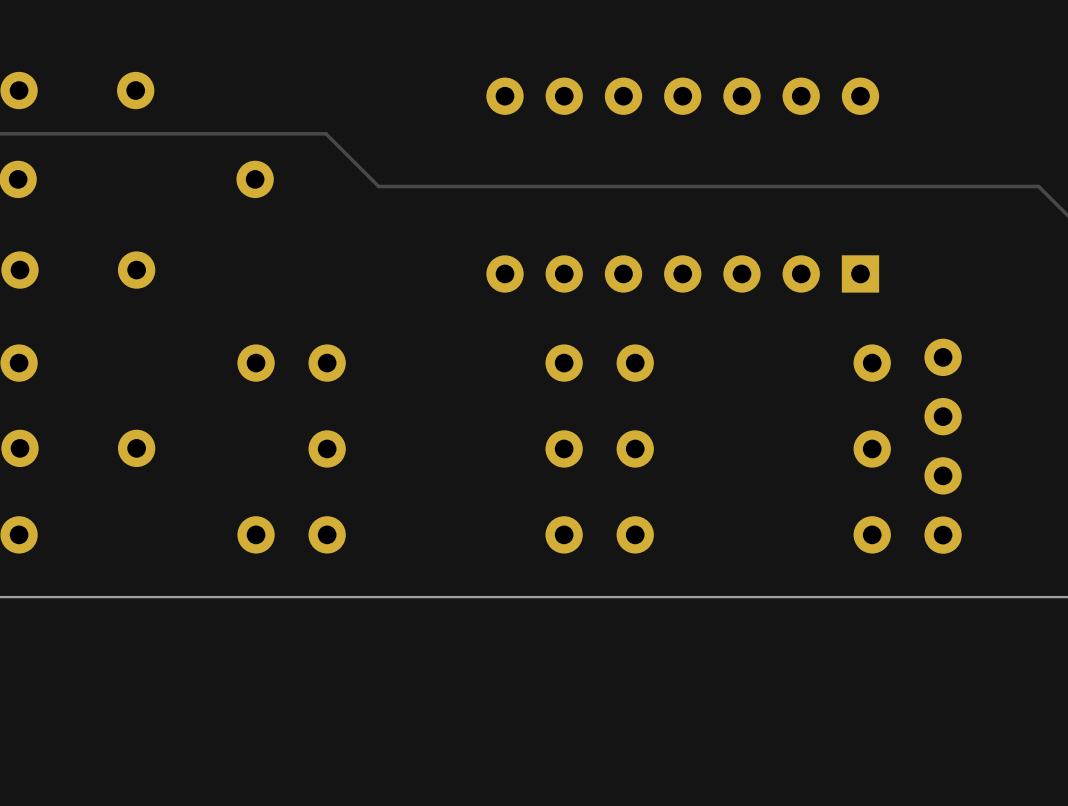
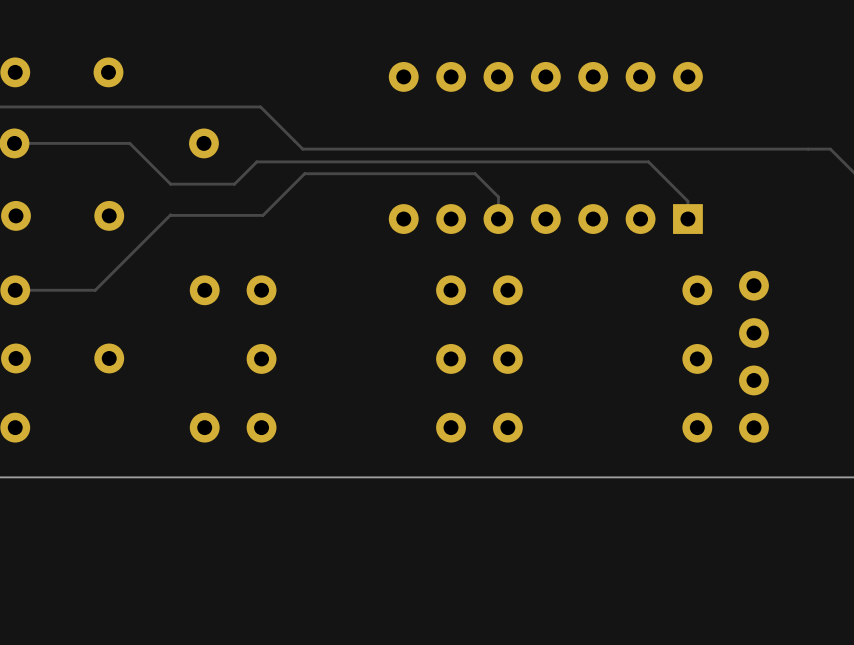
track: none -> (14, 143) (129, 143) (170, 184) (234, 184) (256, 161) (648, 161) (687, 201) (687, 219)
track: none -> (498, 219) (498, 197) (475, 173) (304, 173) (262, 215) (170, 214) (95, 290) (15, 290)

